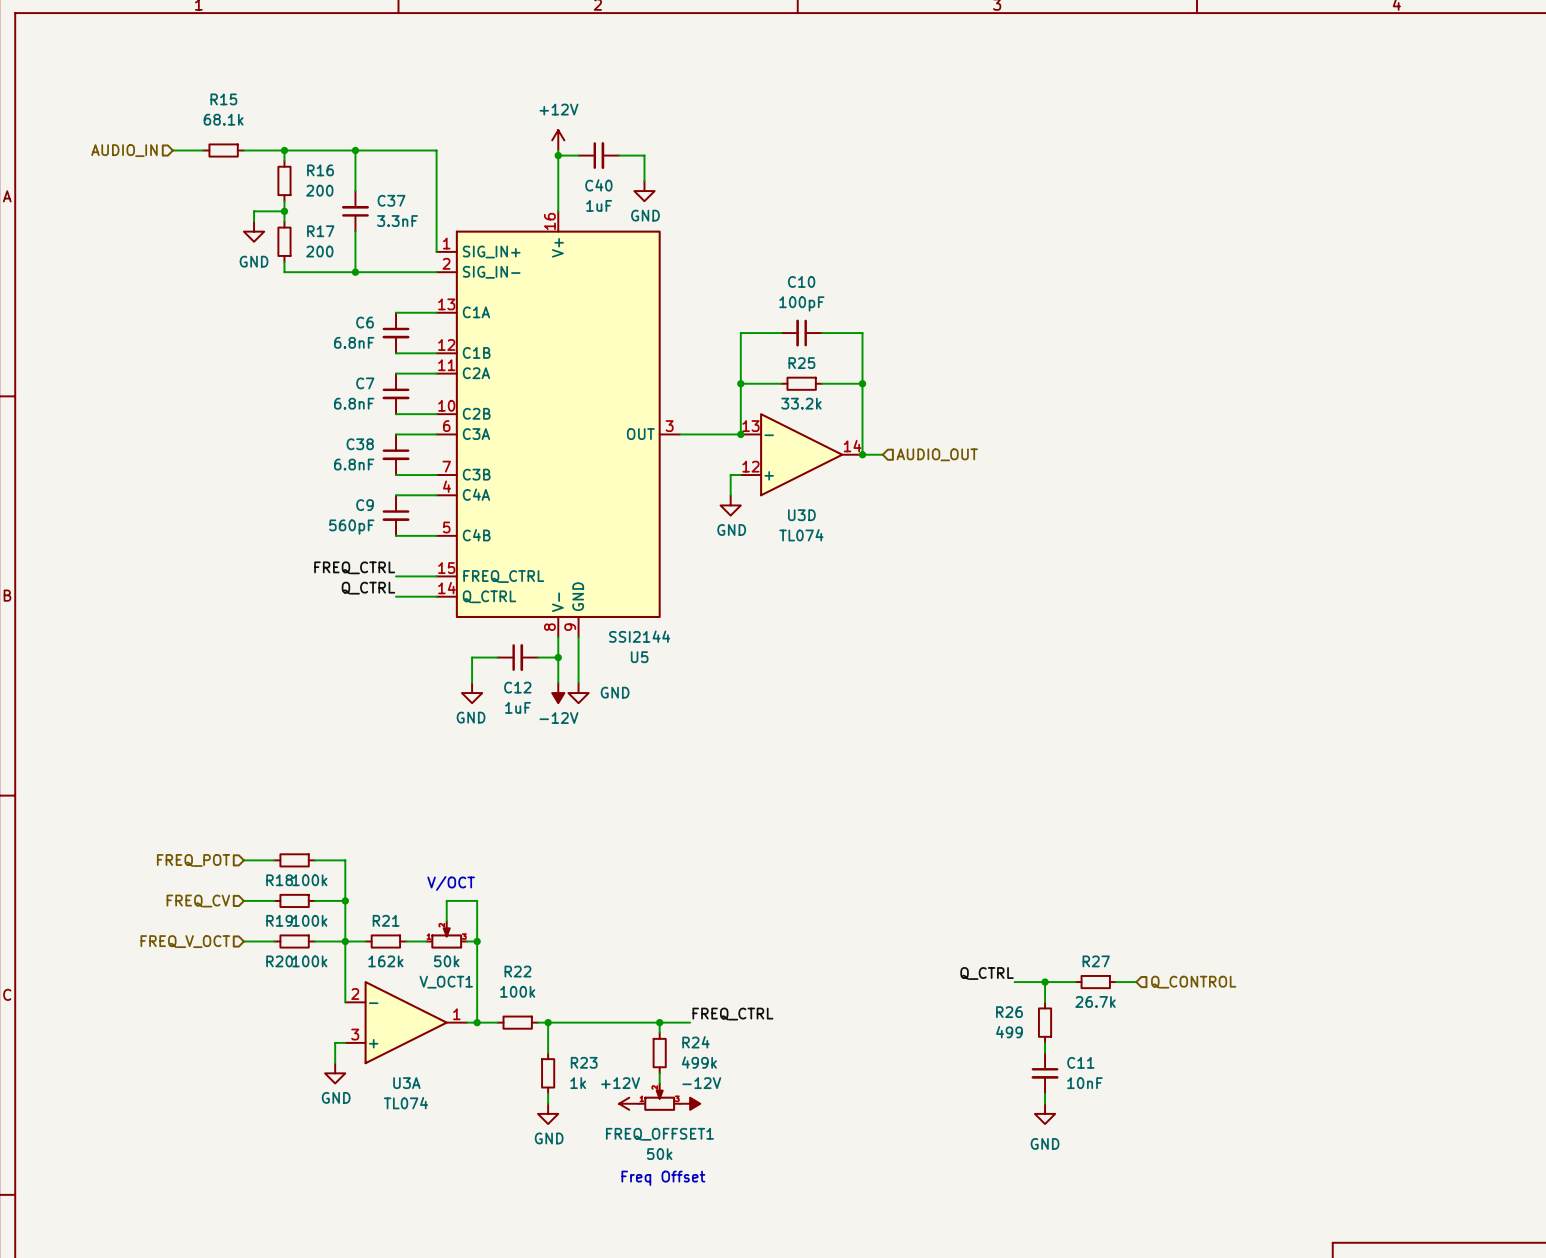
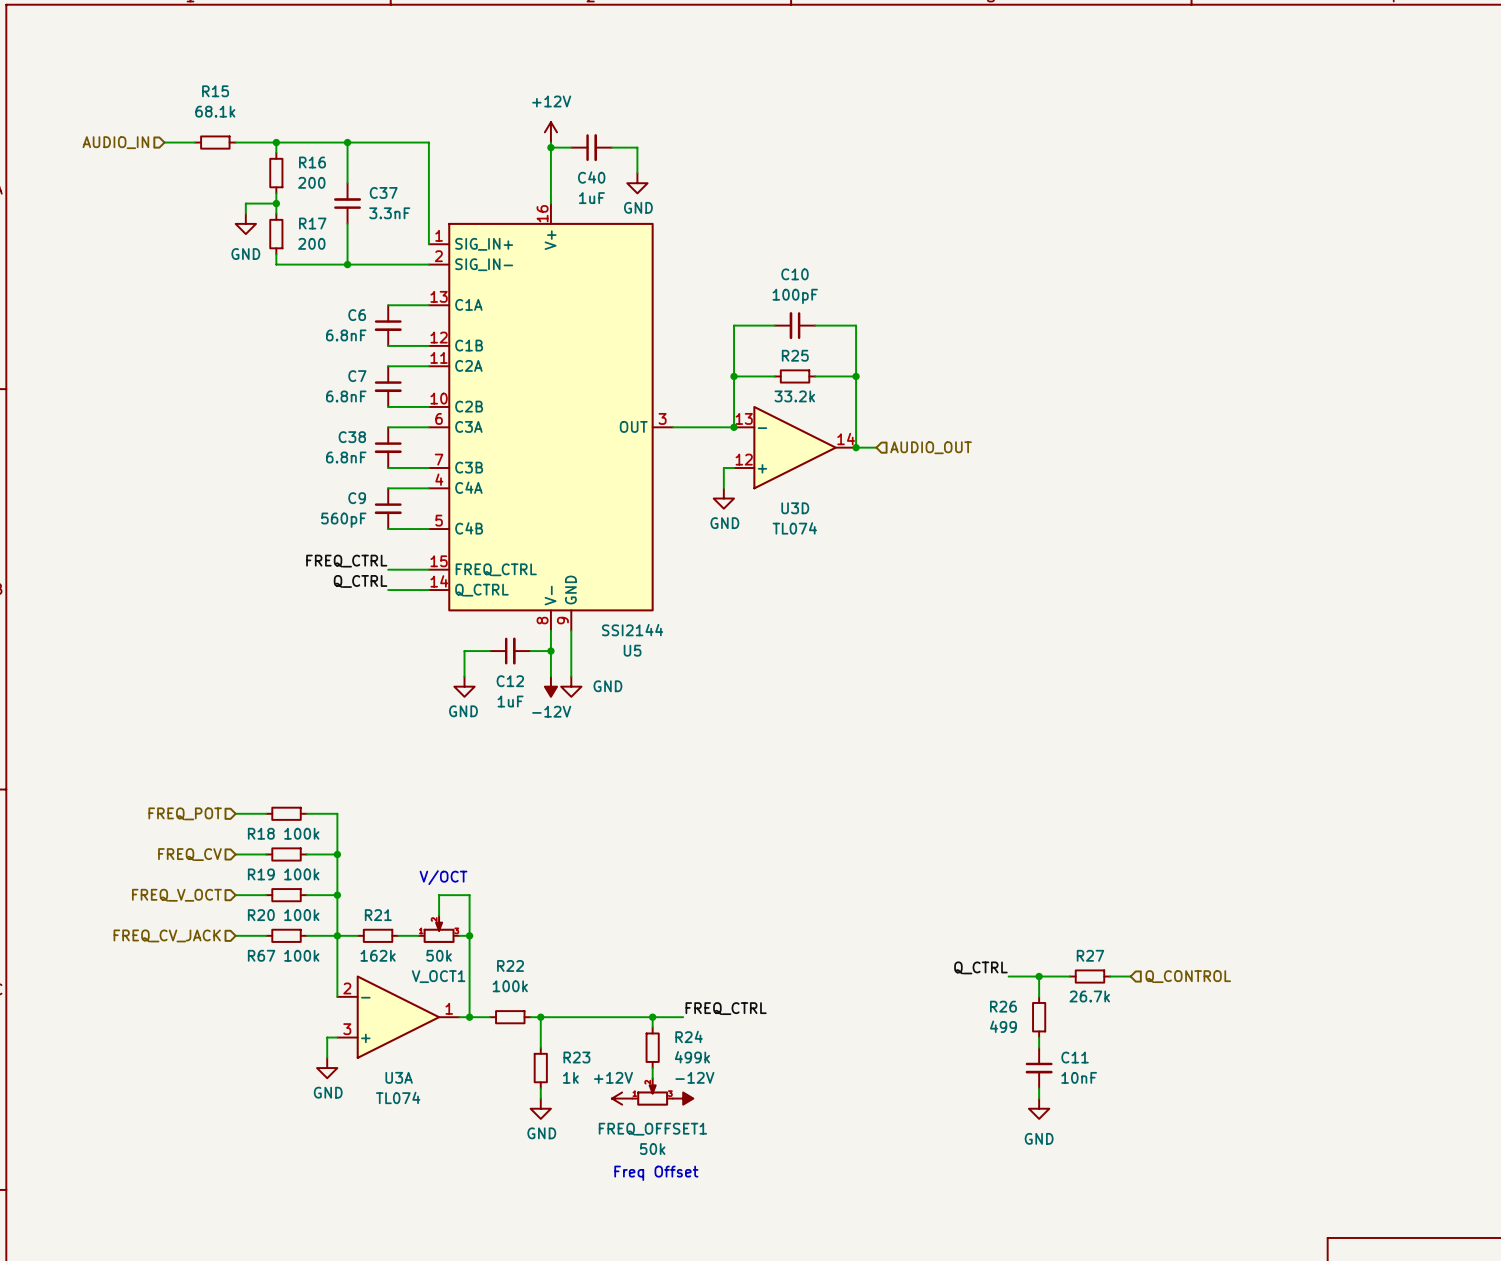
hierarchical label: none -> FREQ_POT (185, 813)
wire: none -> (235, 813) (266, 813)
R18: none -> 100k (286, 813)
wire: none -> (306, 813) (337, 813) (337, 854)
hierarchical label: FREQ_POT (193, 860) -> FREQ_CV (189, 854)
junction: none -> (337, 854)
R18 name: R18 (279, 880) -> R19 (261, 874)
hierarchical label: FREQ_CV (198, 901) -> FREQ_V_OCT (176, 895)
R19 name: R19 (279, 920) -> R20 (261, 915)
hierarchical label: FREQ_V_OCT (185, 941) -> FREQ_CV_JACK (167, 935)
R20 name: R20 (279, 961) -> R67 (261, 955)

